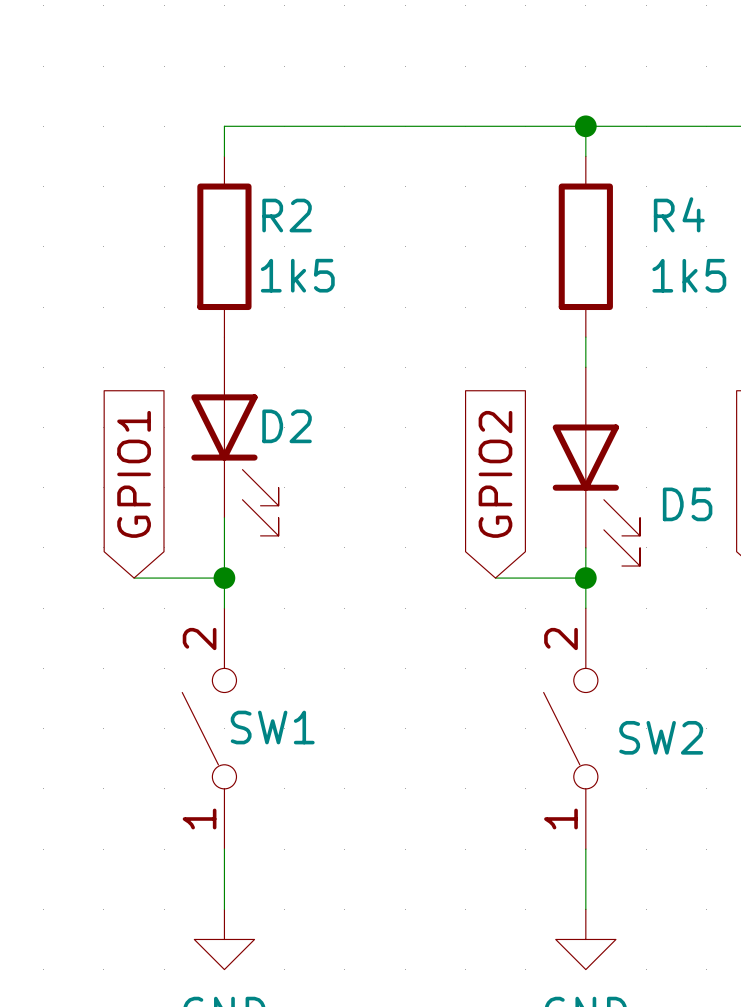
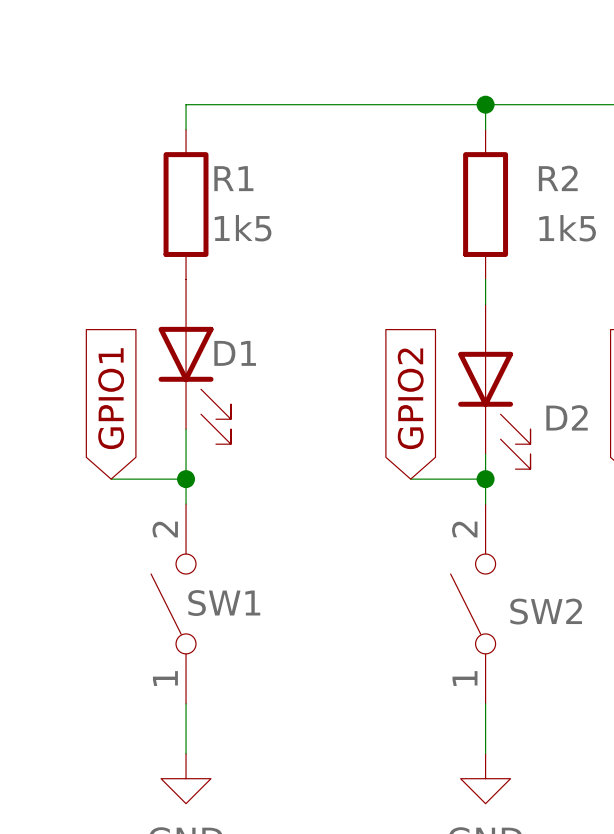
R4 name: R4 (679, 214) -> R2 (558, 178)
R2 name: R2 (287, 215) -> R1 (233, 178)
D2 name: D2 (287, 426) -> D1 (235, 353)
D5 name: D5 (687, 504) -> D2 (567, 417)

